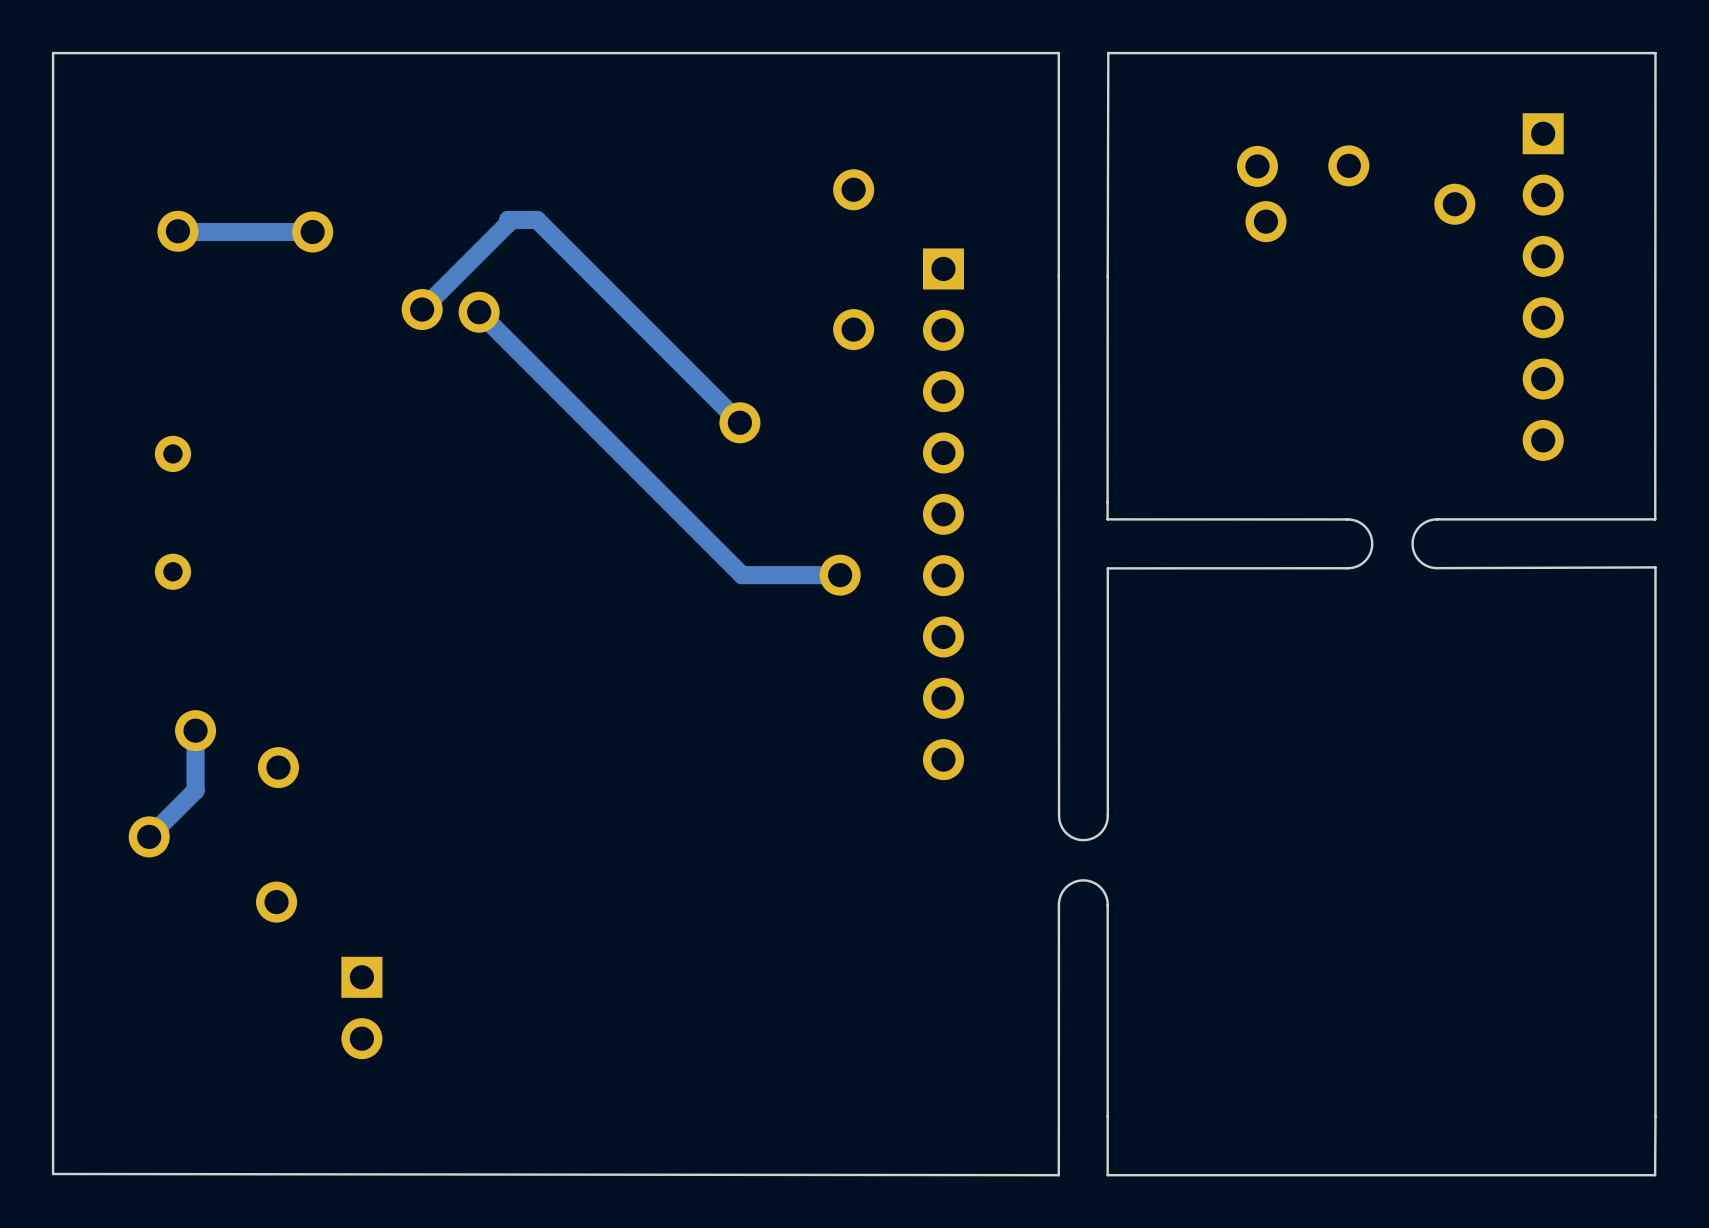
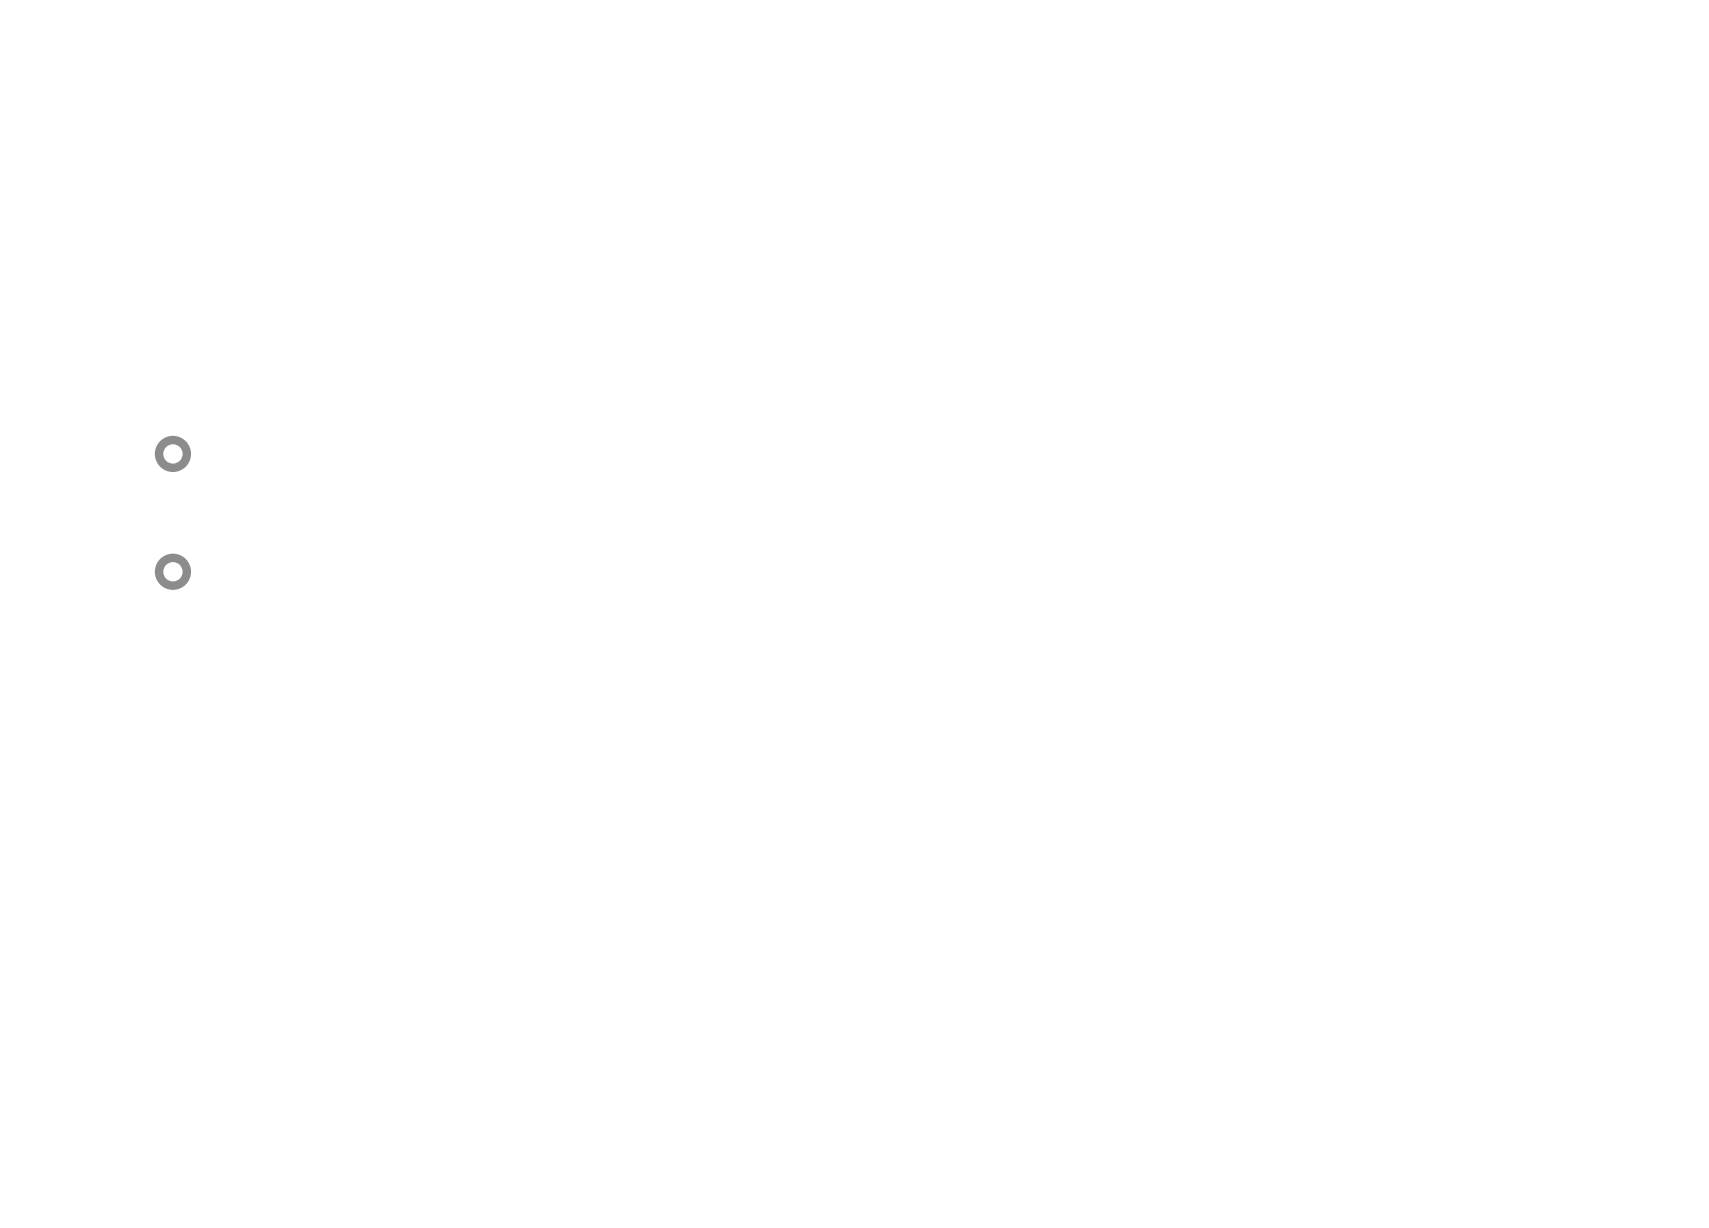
board edge: (1655, 53) (1108, 53) (1107, 519) (1350, 519) (1358, 522) (1365, 527) (1370, 535) (1372, 543) (1370, 552) (1366, 560) (1359, 565) (1350, 568) (1107, 568) (1107, 818) (1105, 826) (1099, 833) (1092, 838) (1083, 840) (1072, 837) (1065, 831) (1060, 824) (1059, 815) (1058, 53) (53, 53) (53, 1173) (1058, 1175) (1059, 902) (1061, 893) (1067, 886) (1074, 881) (1083, 880) (1092, 882) (1099, 886) (1105, 893) (1107, 902) (1107, 1175) (1655, 1175) (1655, 567) (1434, 567) (1425, 565) (1418, 559) (1414, 552) (1412, 543) (1414, 534) (1418, 527) (1425, 522) (1434, 519) (1655, 519) (1655, 53) -> none
part: (1348, 165) -> none
part: (1257, 166) -> none
part: (853, 189) -> none
part: (1454, 204) -> none
part: (1265, 221) -> none
track: (177, 231) (312, 232) -> none
part: (177, 231) -> none
part: (312, 232) -> none
part: (1543, 287) -> none
track: (422, 309) (508, 223) (508, 219) (537, 219) (739, 422) -> none
part: (422, 309) -> none
track: (479, 312) (742, 575) (840, 575) -> none
part: (479, 312) -> none
part: (853, 329) -> none
part: (739, 422) -> none
part: (943, 514) -> none
part: (840, 575) -> none
track: (195, 730) (195, 790) (149, 836) -> none
part: (195, 730) -> none
part: (278, 767) -> none
part: (149, 836) -> none
part: (276, 902) -> none
part: (361, 1007) -> none

